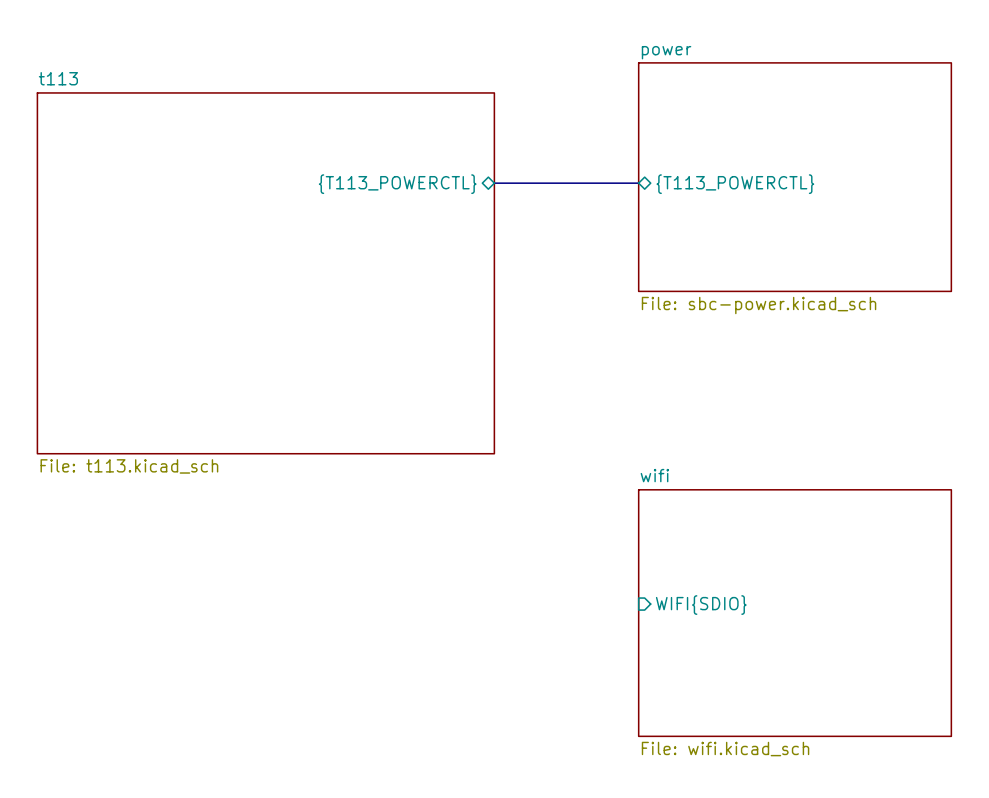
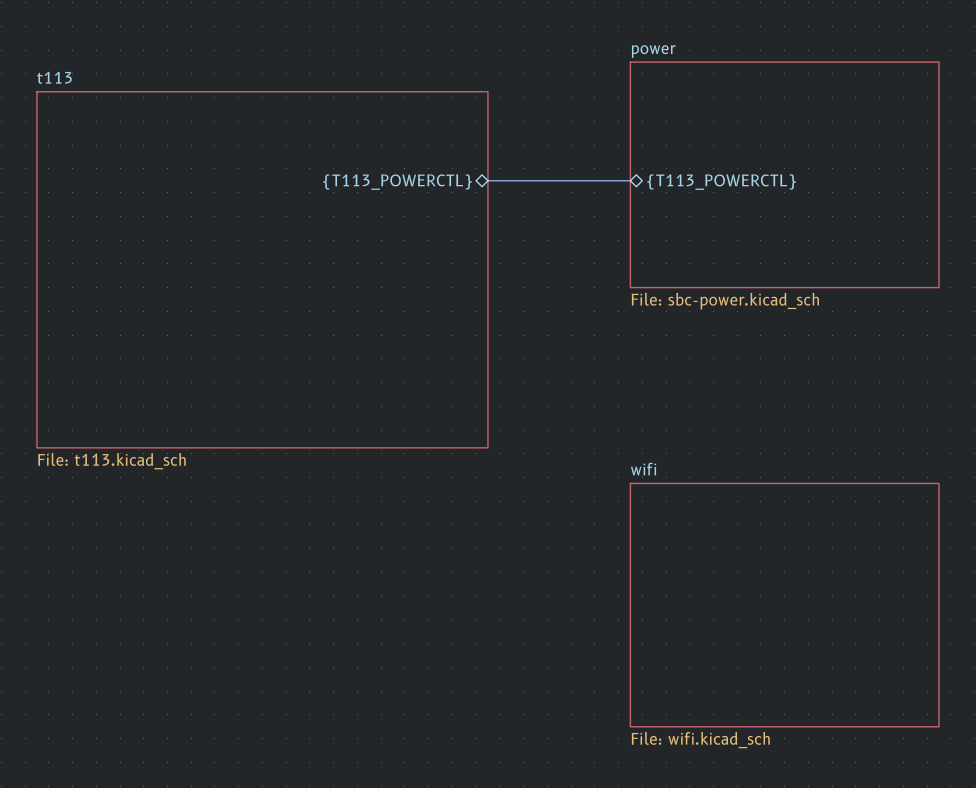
sheet pin: WIFI{SDIO} (701, 605) -> none

